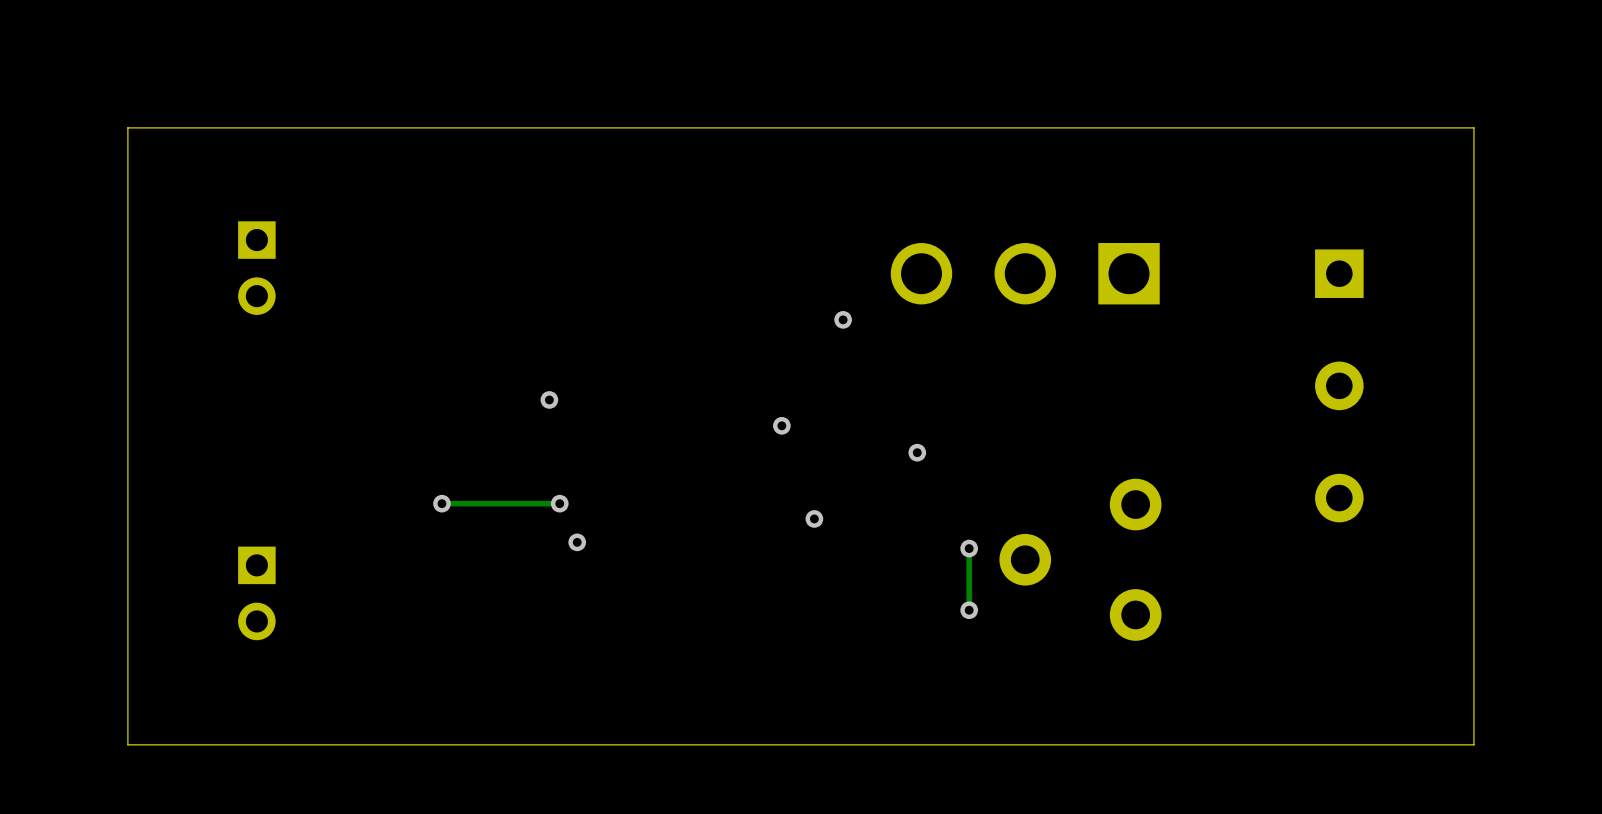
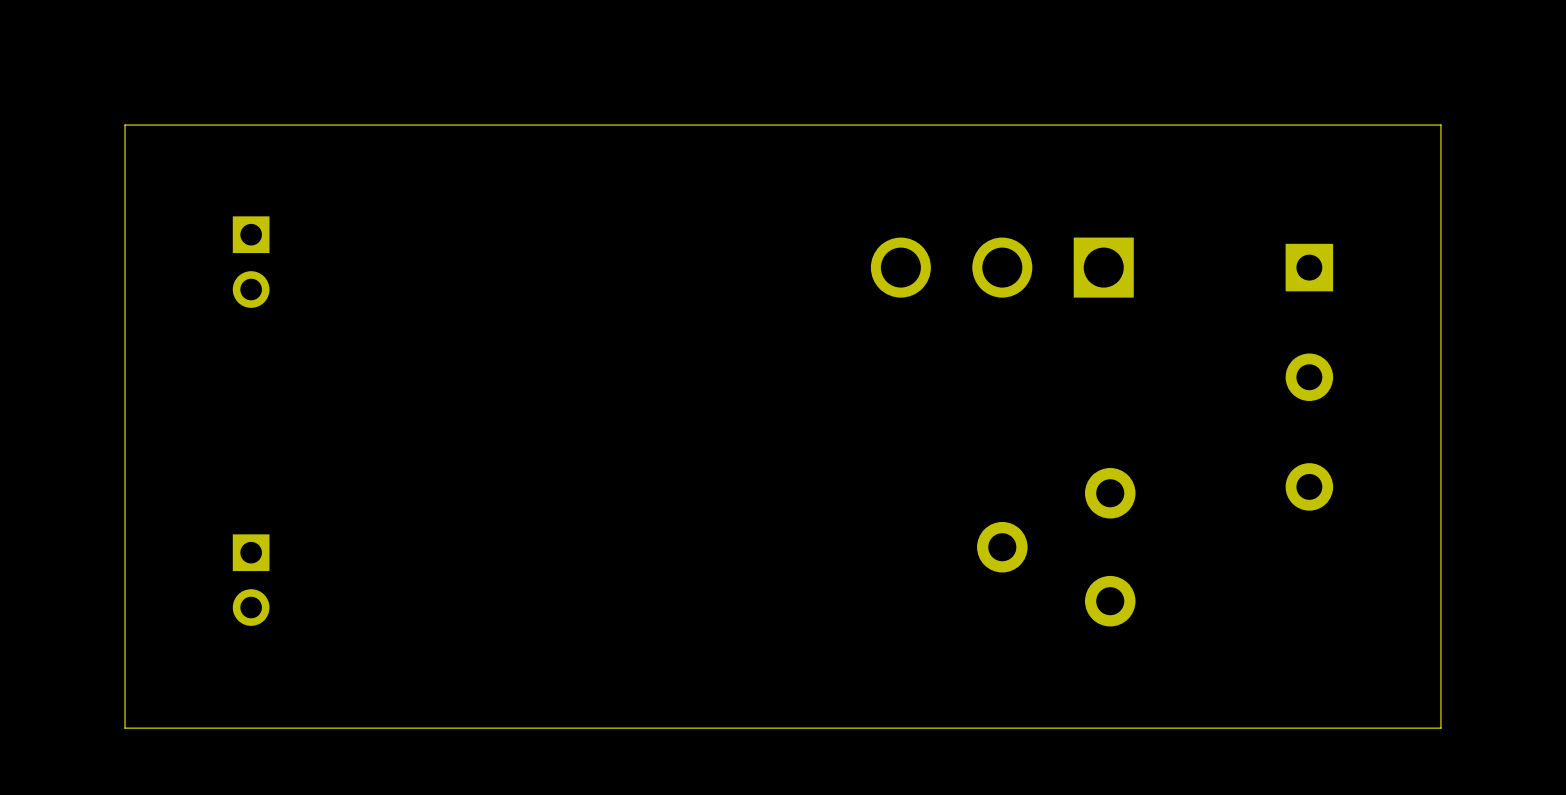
via: (843, 319) -> none
via: (549, 399) -> none
via: (781, 425) -> none
via: (917, 452) -> none
via: (441, 503) -> none
track: (559, 503) (441, 503) -> none
via: (559, 503) -> none
via: (814, 518) -> none
via: (577, 542) -> none
track: (969, 548) (969, 610) -> none
via: (969, 548) -> none
via: (969, 610) -> none

